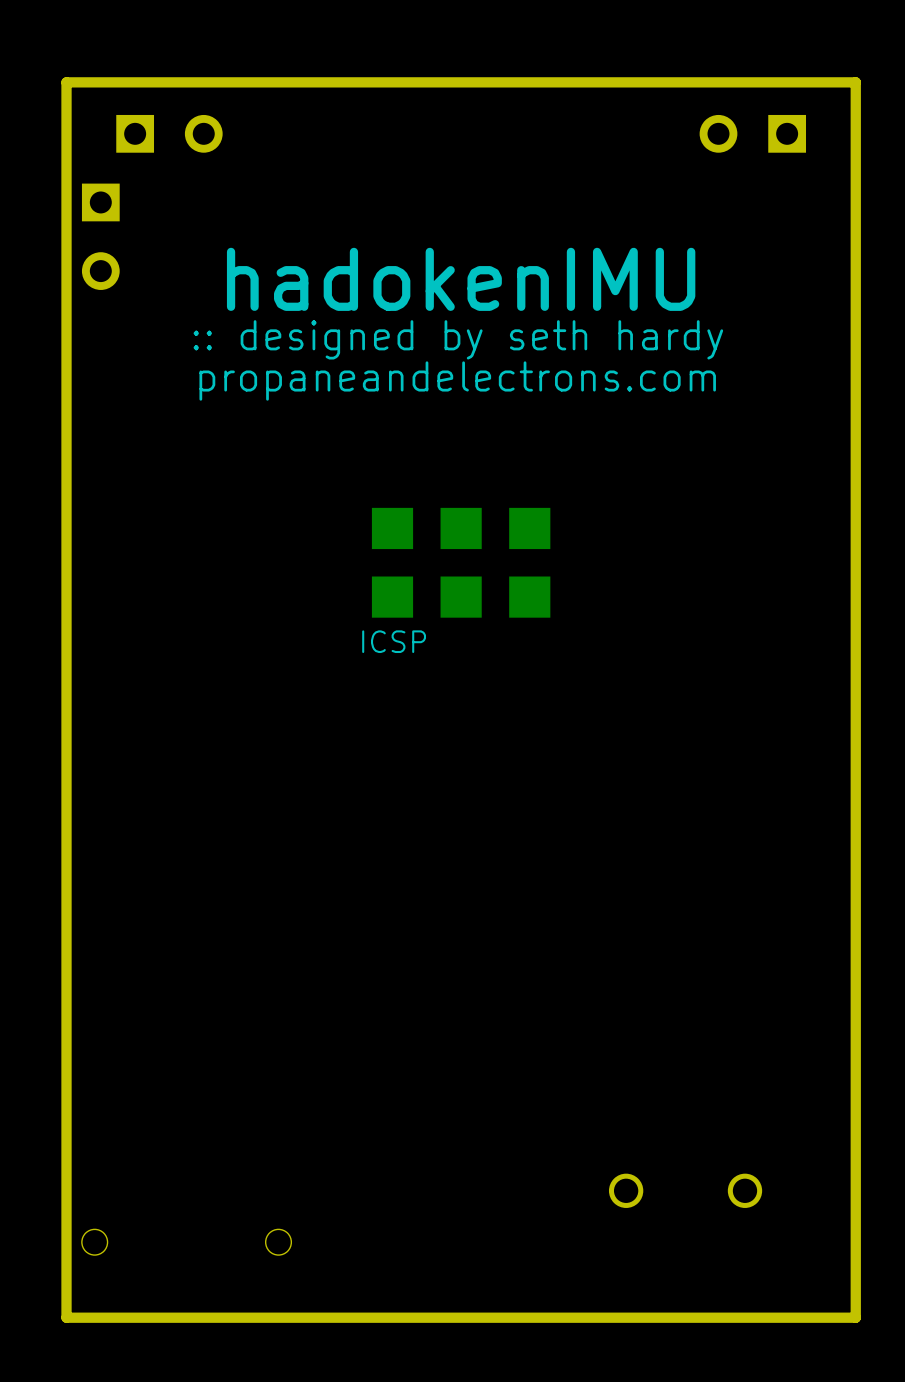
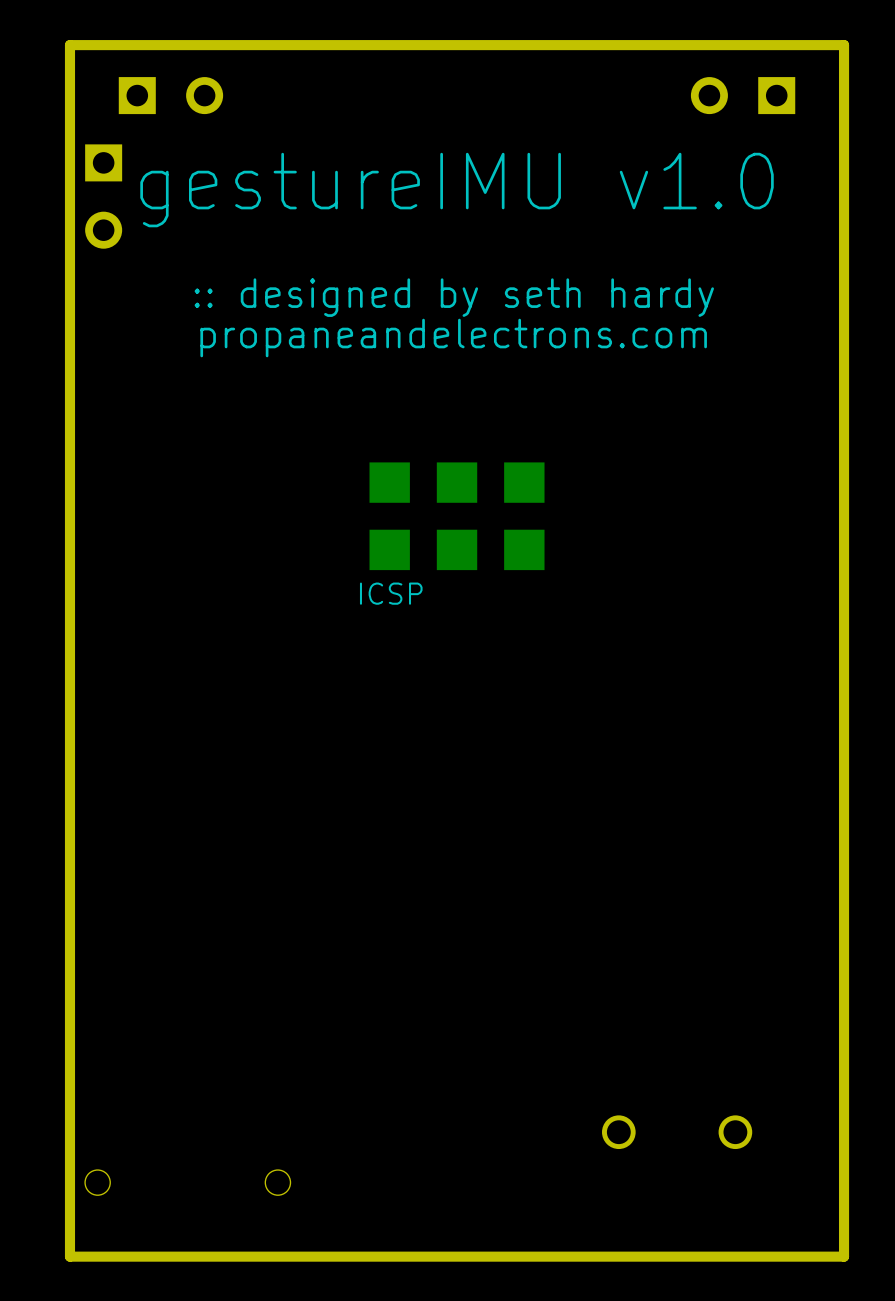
text: none -> gestureIMU v1.0 (457, 190)
text: hadokenIMU (461, 279) -> none

